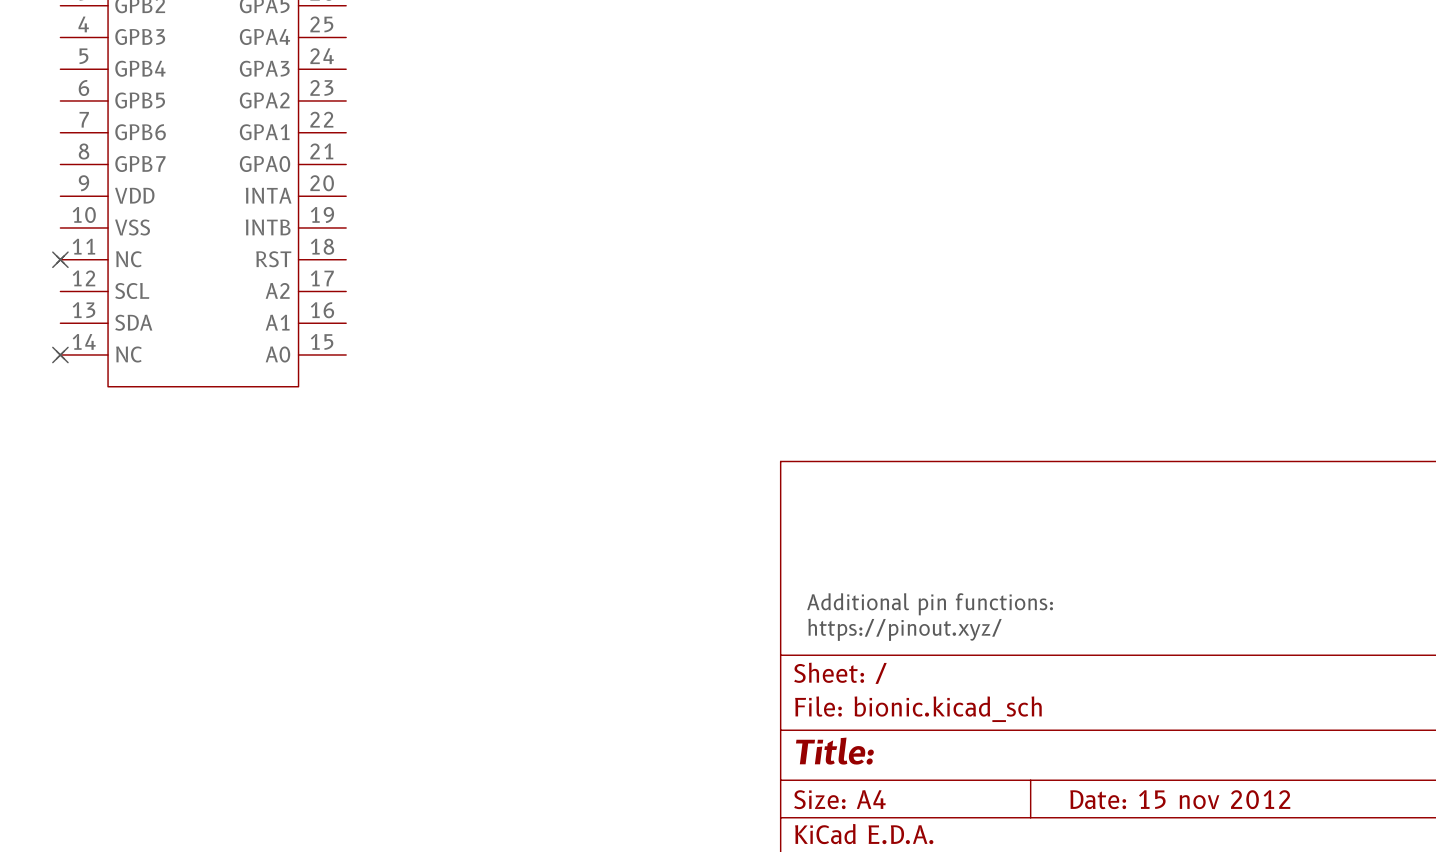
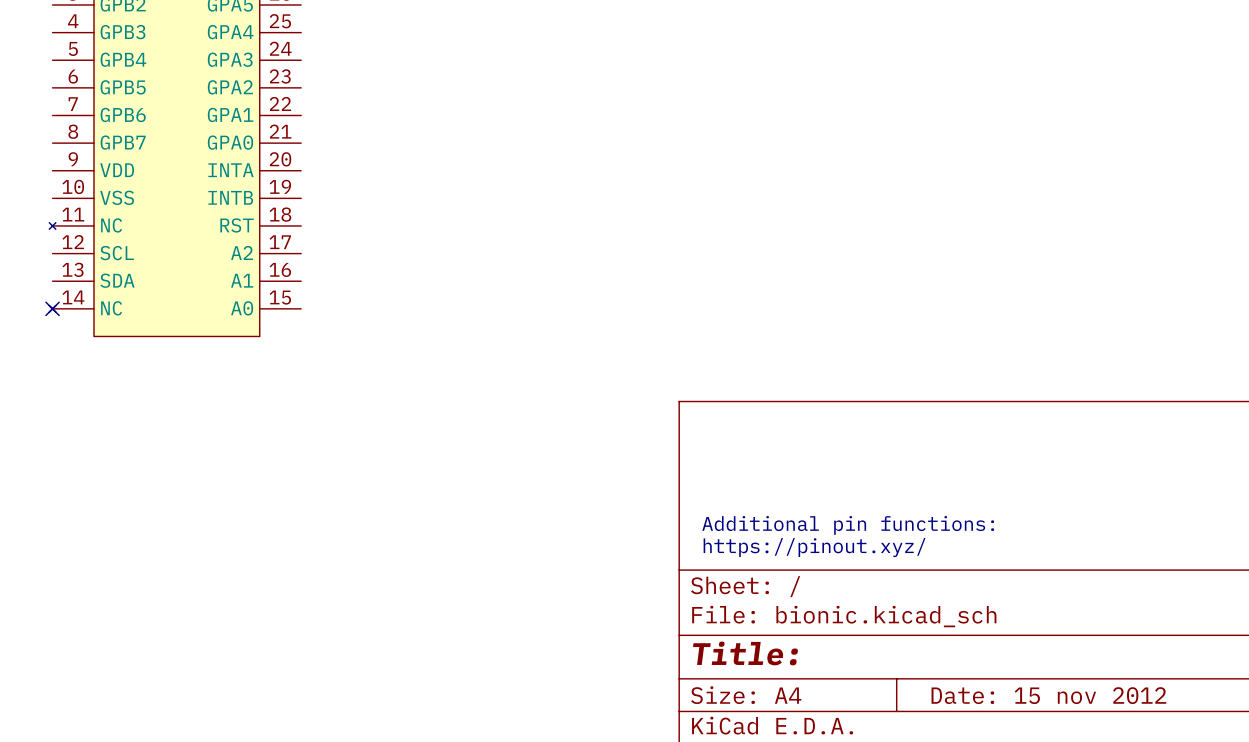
no-connect mark: (60, 259) -> none

